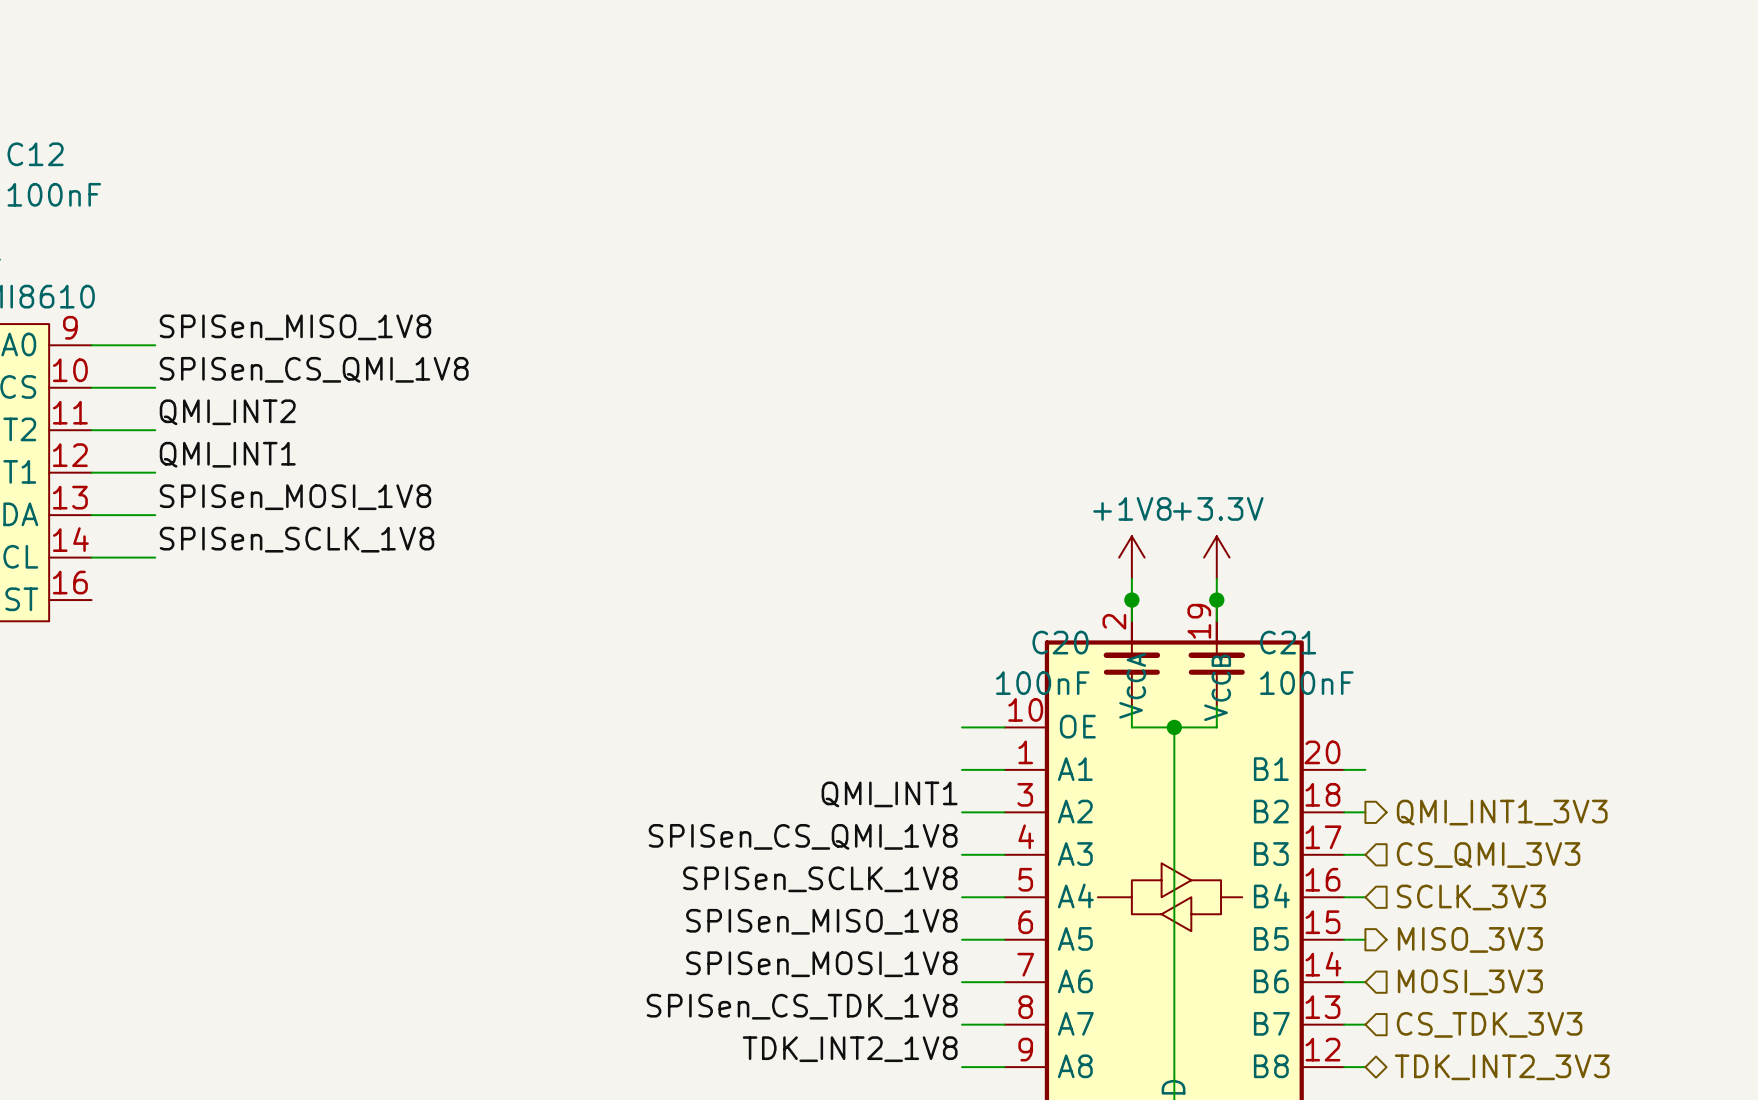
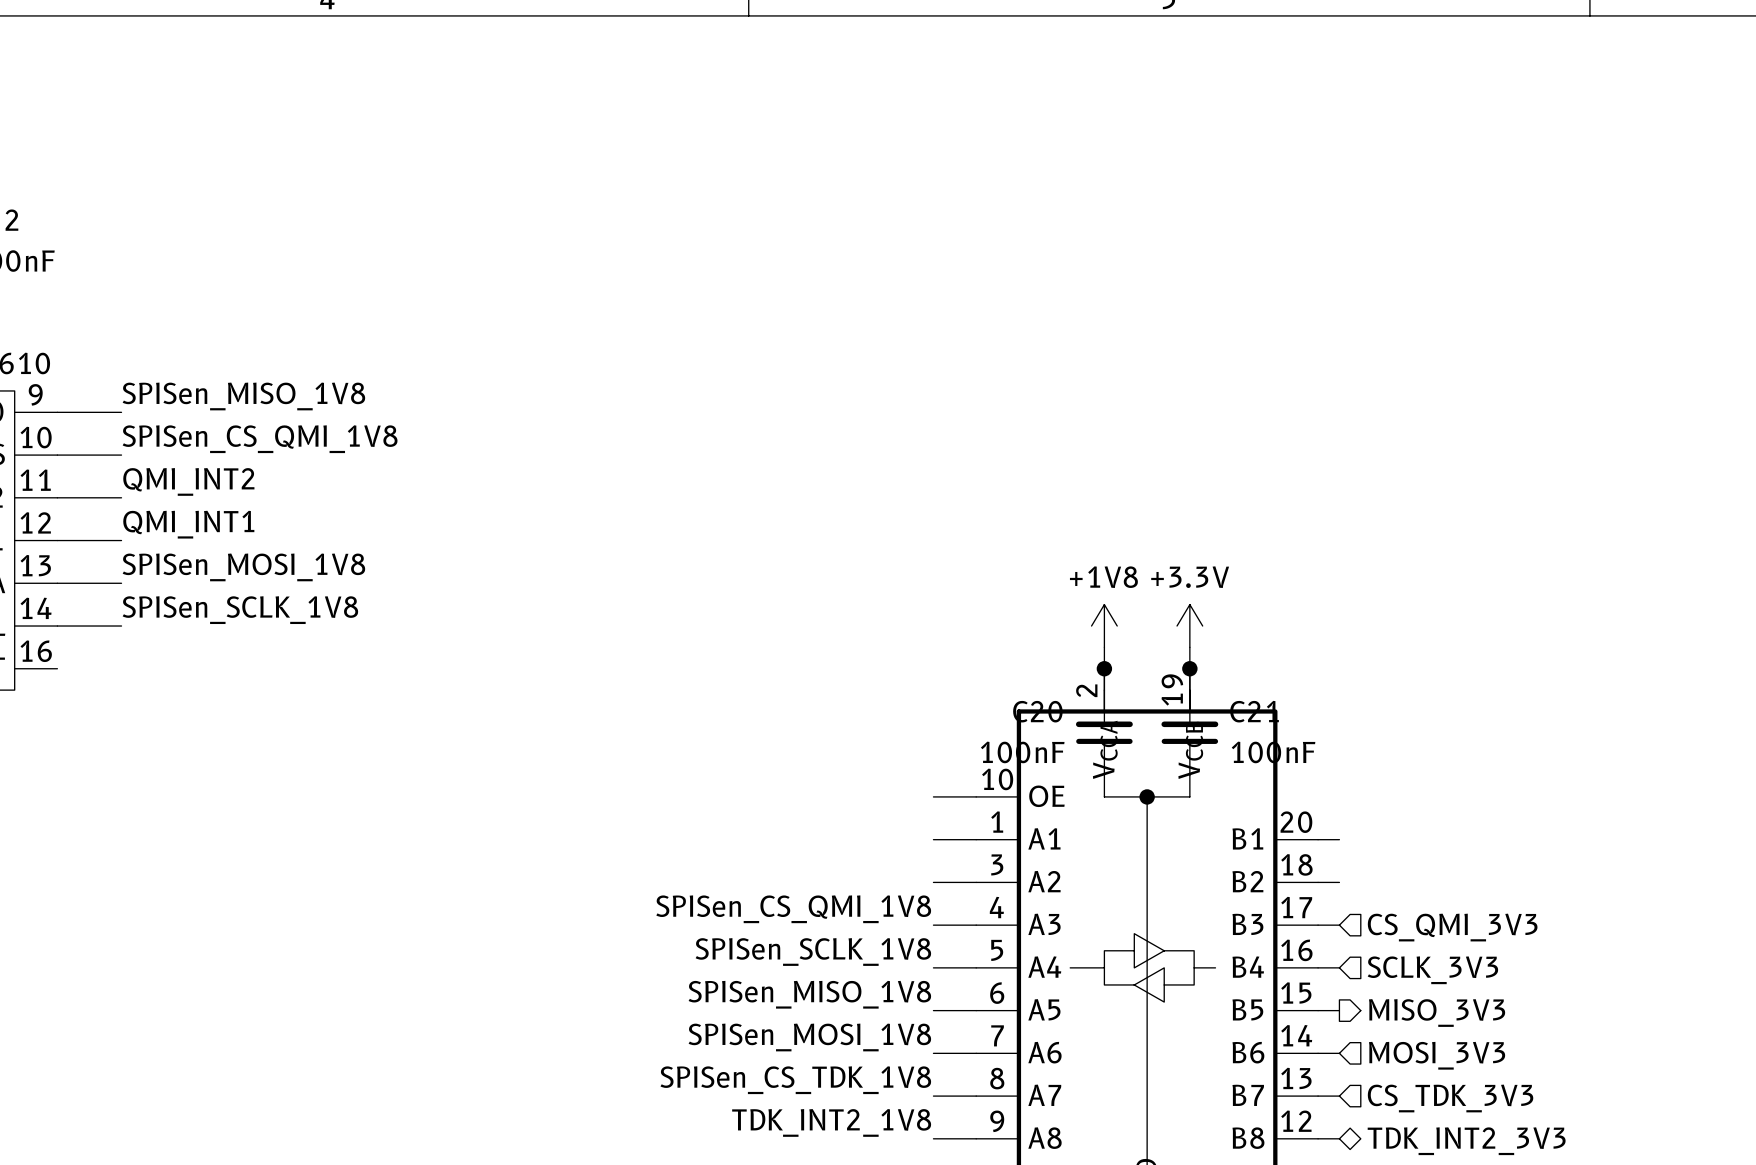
label: QMI_INT1 (889, 794) -> none
hierarchical label: QMI_INT1_3V3 (1502, 812) -> none

